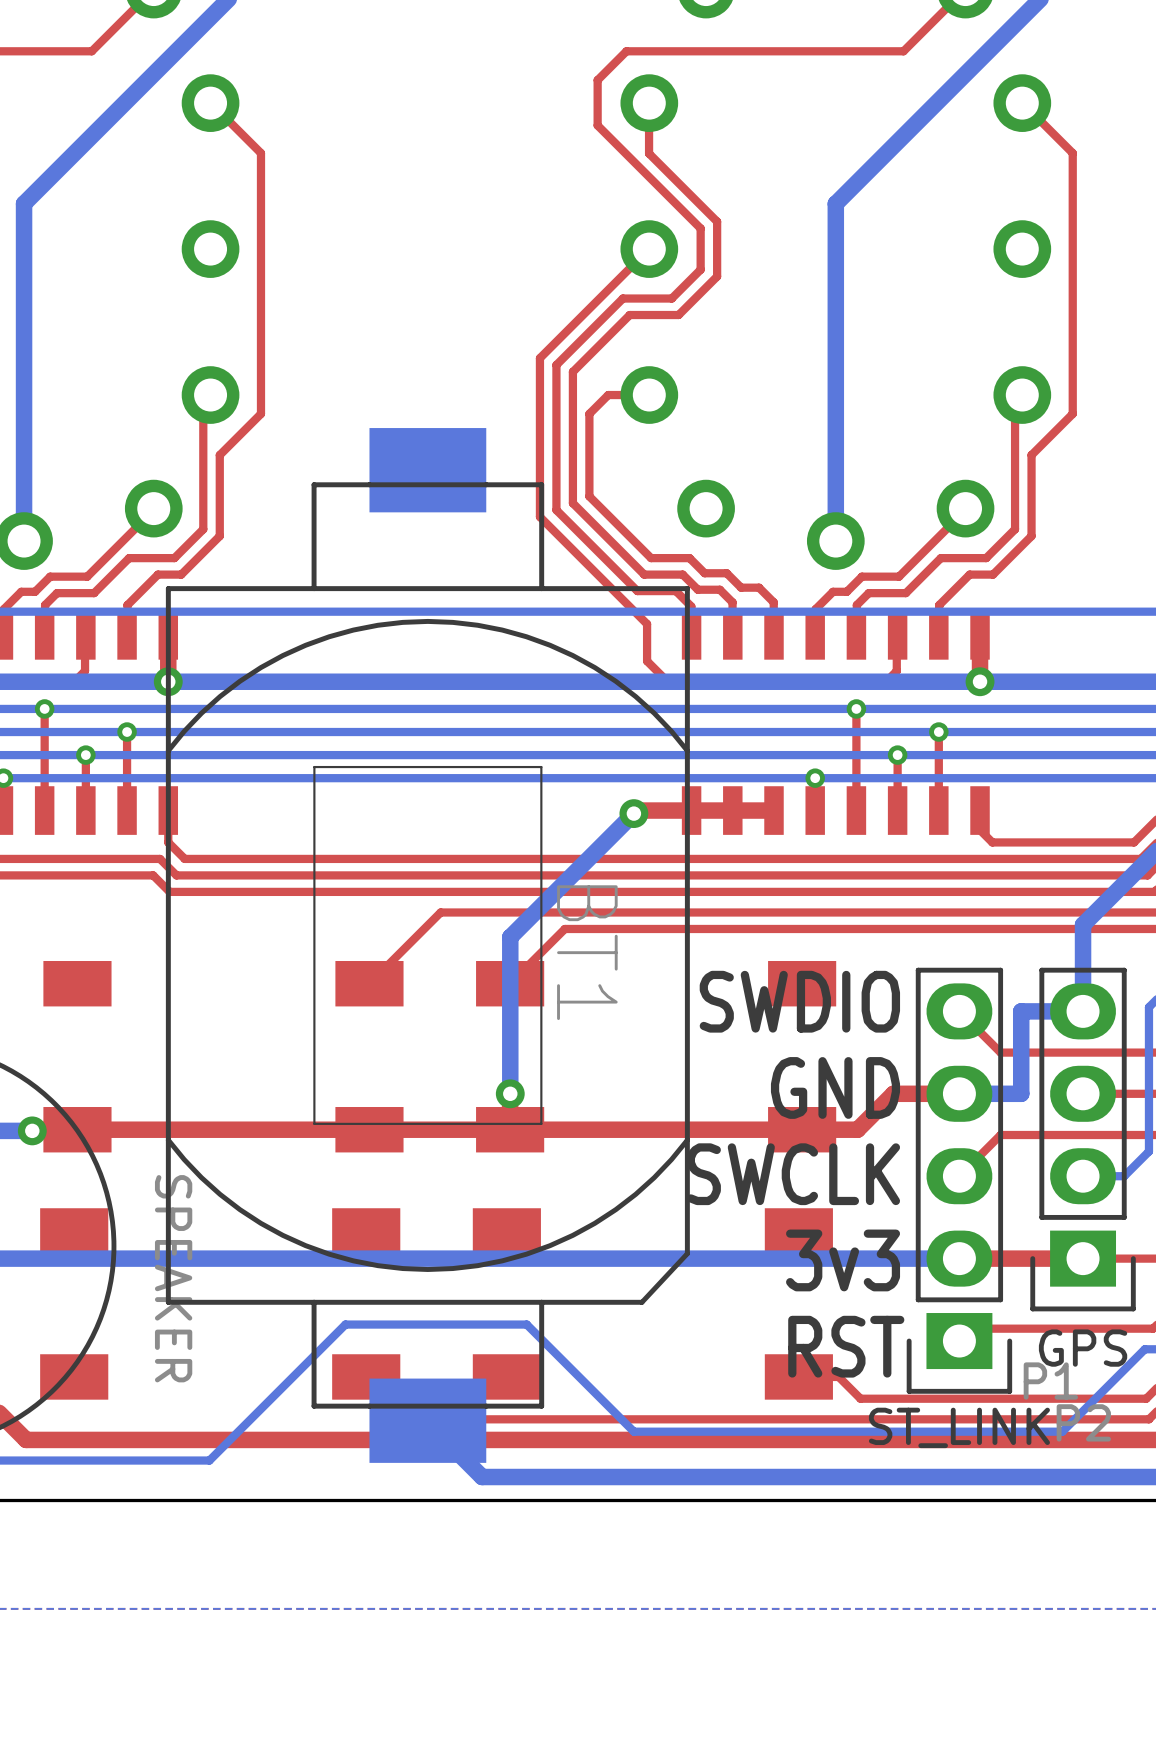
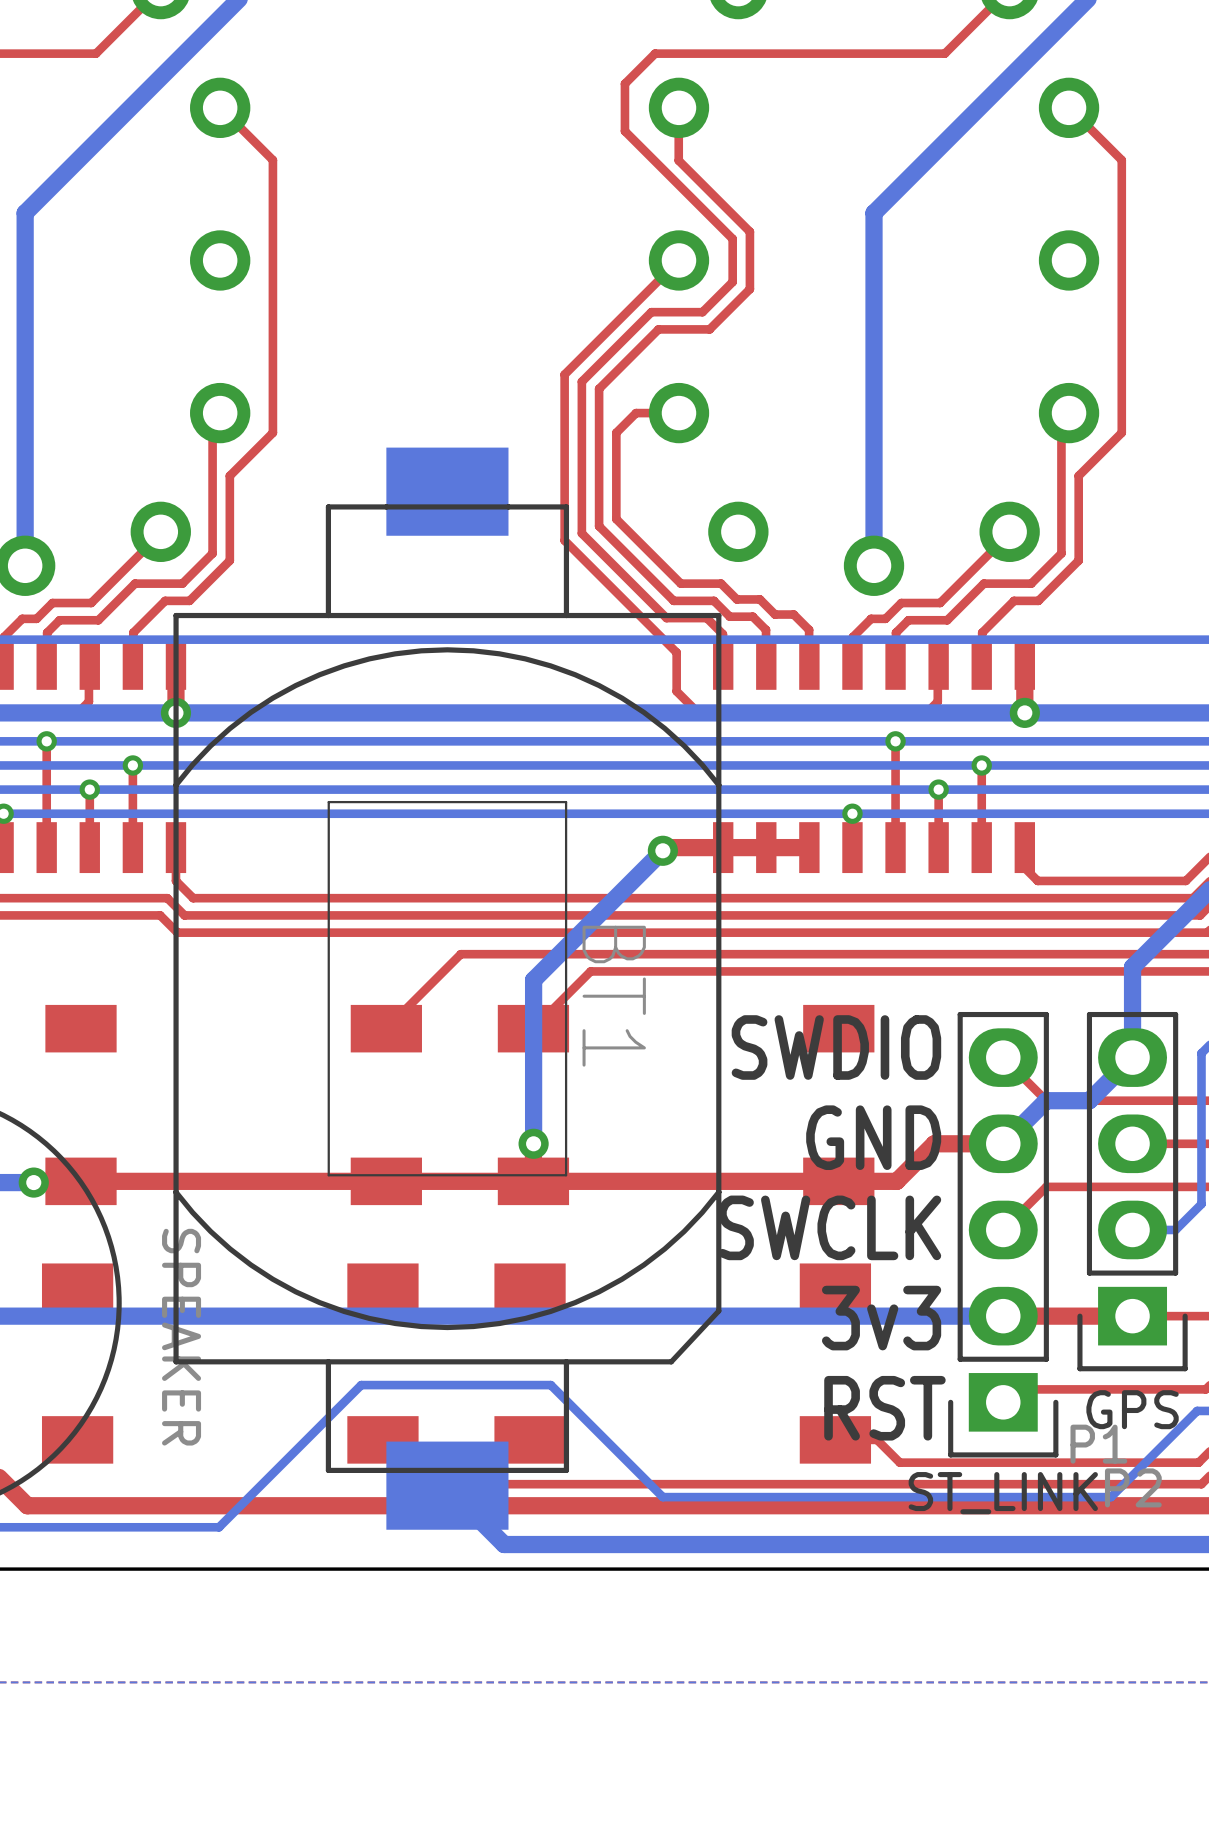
bottom track: (1083, 1011) (1021, 1011) (1021, 1093) (959, 1093) -> (1132, 1057) (1089, 1100) (1046, 1100) (1003, 1143)

